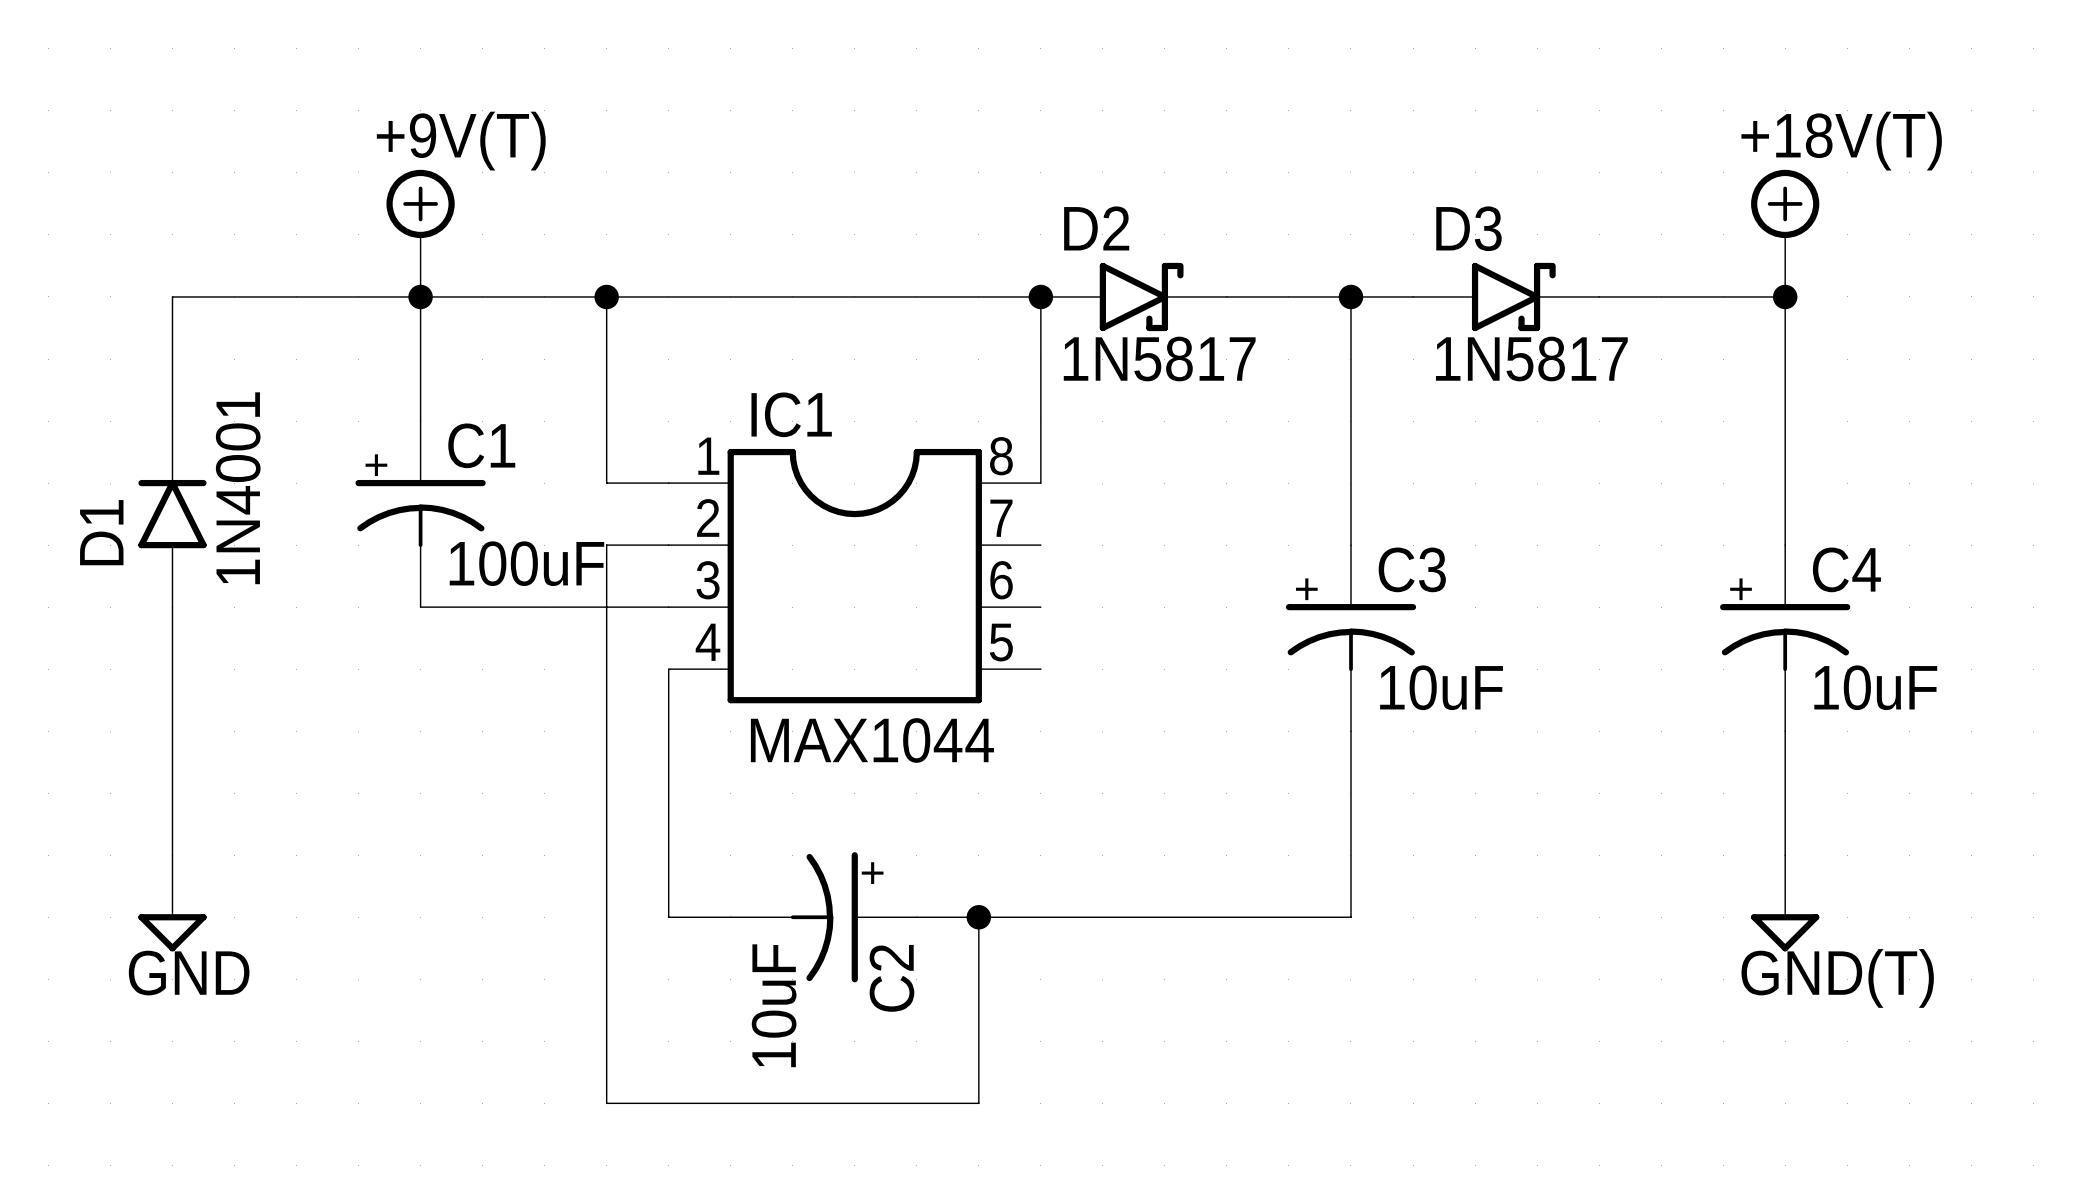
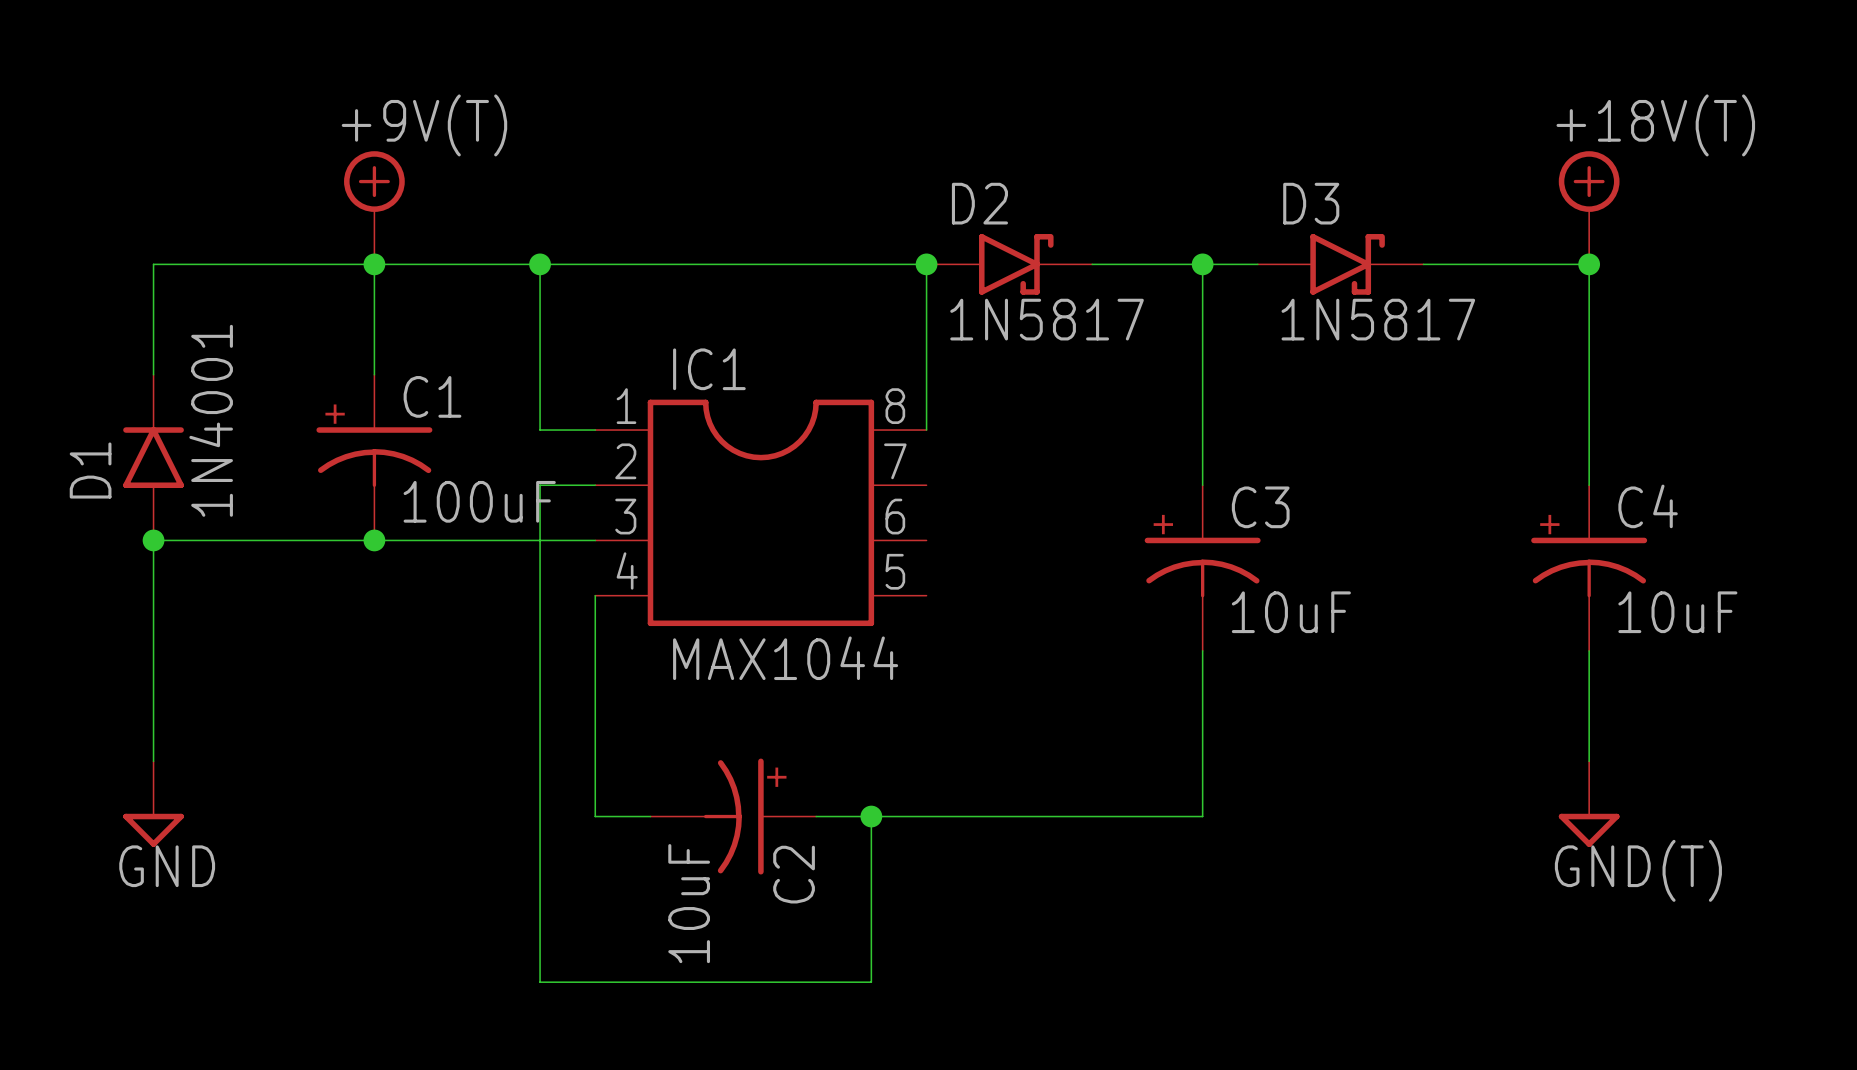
wire: none -> (153, 540) (374, 540)
junction: none -> (153, 540)
junction: none -> (374, 540)

